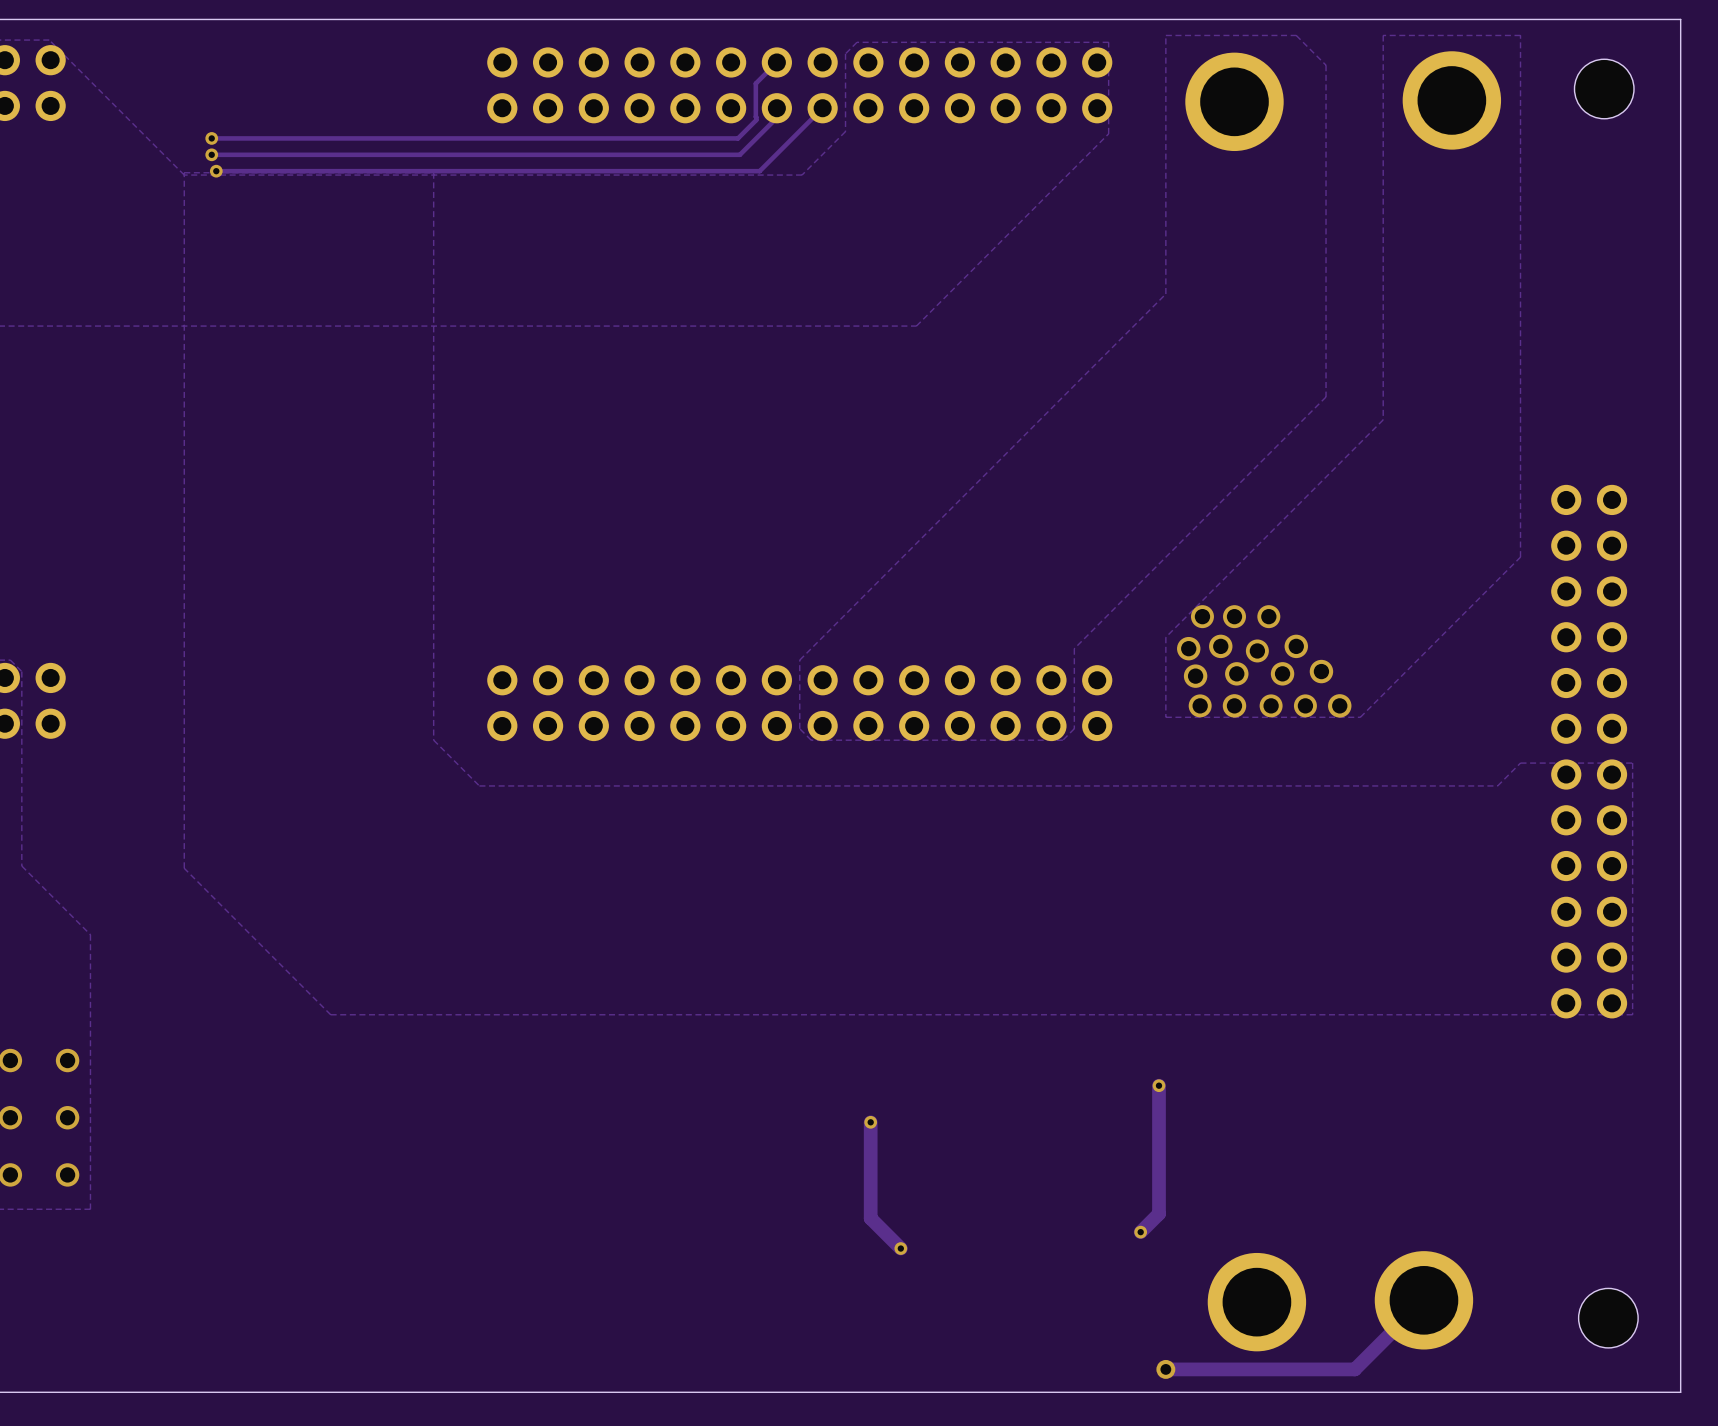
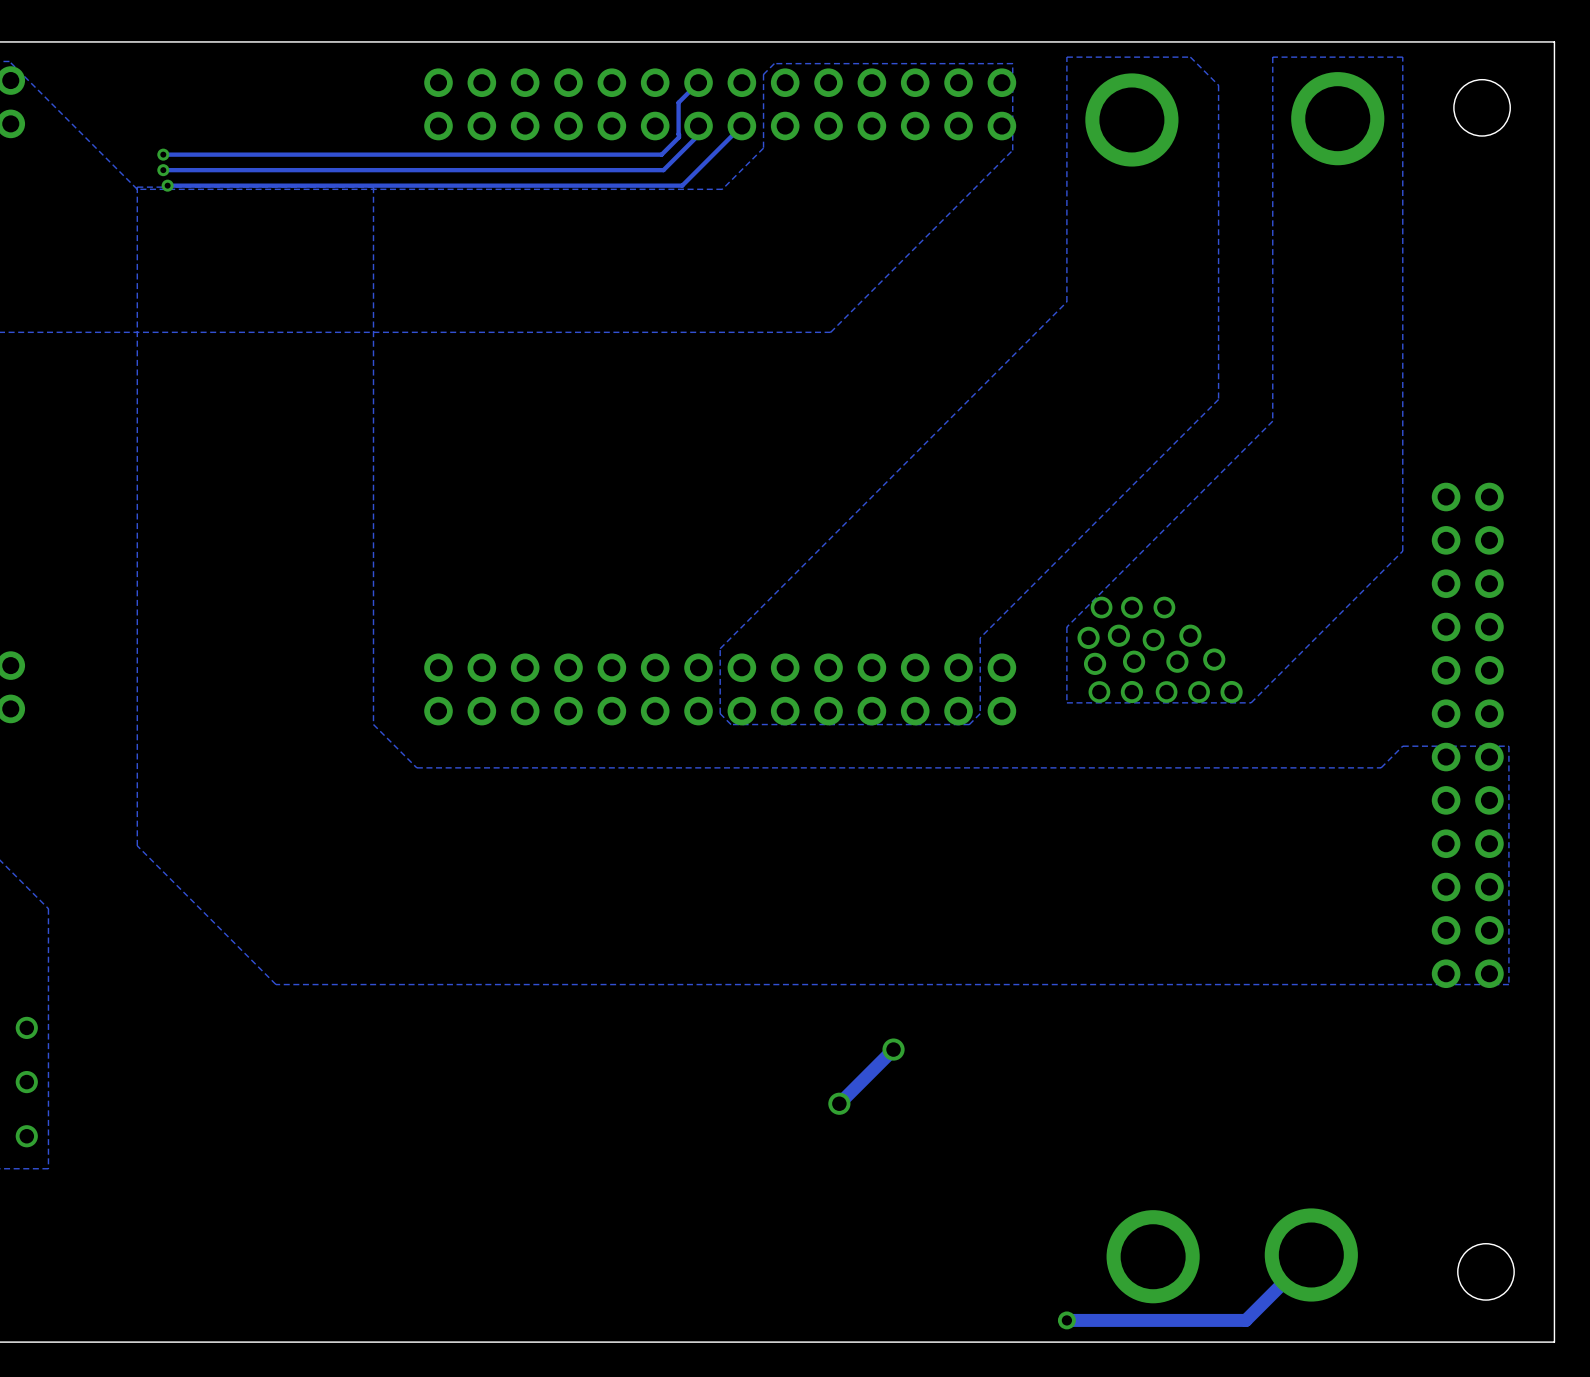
track: none -> (893, 1049) (839, 1103)
via: none -> (893, 1049)
track: (1158, 1085) (1158, 1213) (1140, 1232) -> none
via: (1158, 1085) -> none
track: (870, 1122) (870, 1218) (900, 1248) -> none
via: (870, 1122) -> none
via: none -> (839, 1103)
via: (1140, 1232) -> none
via: (900, 1248) -> none

